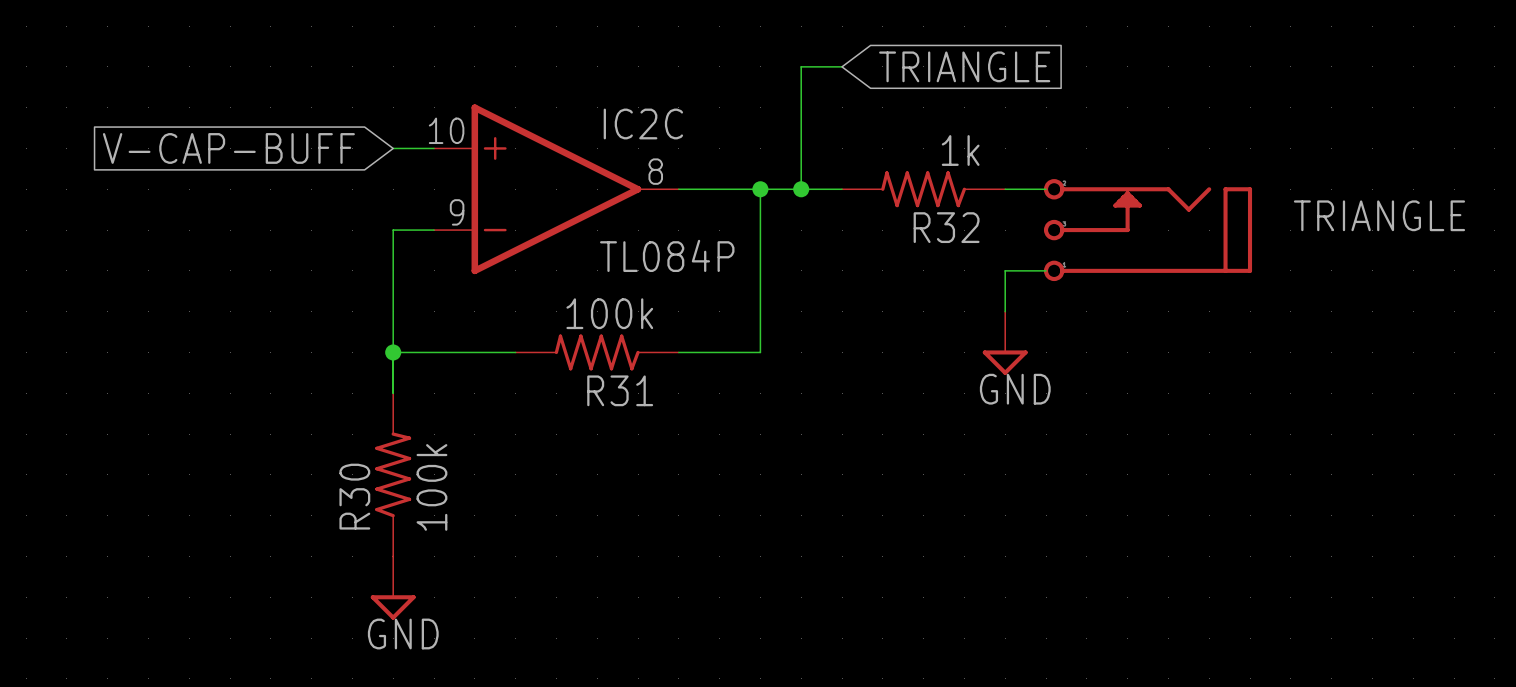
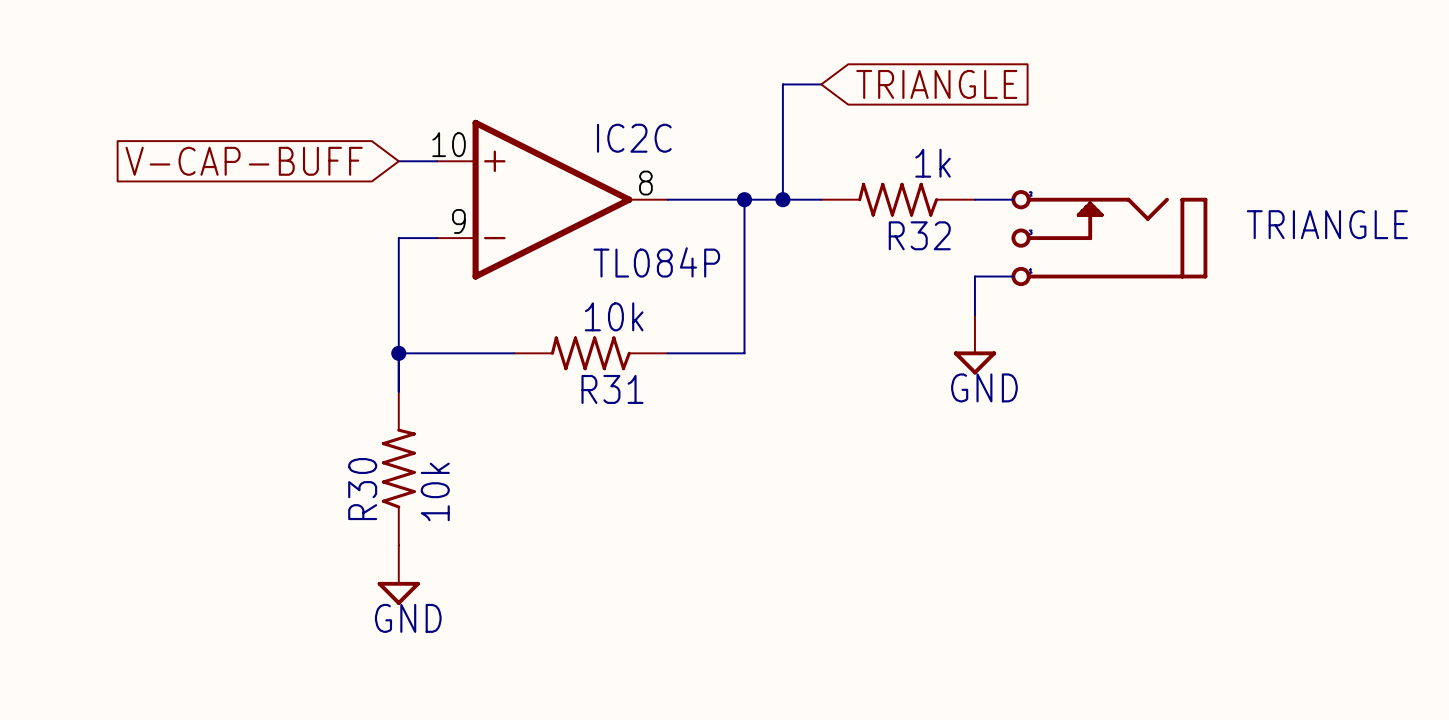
R31 value: 100k (609, 313) -> 10k (614, 316)
R30 value: 100k (431, 487) -> 10k (435, 491)

